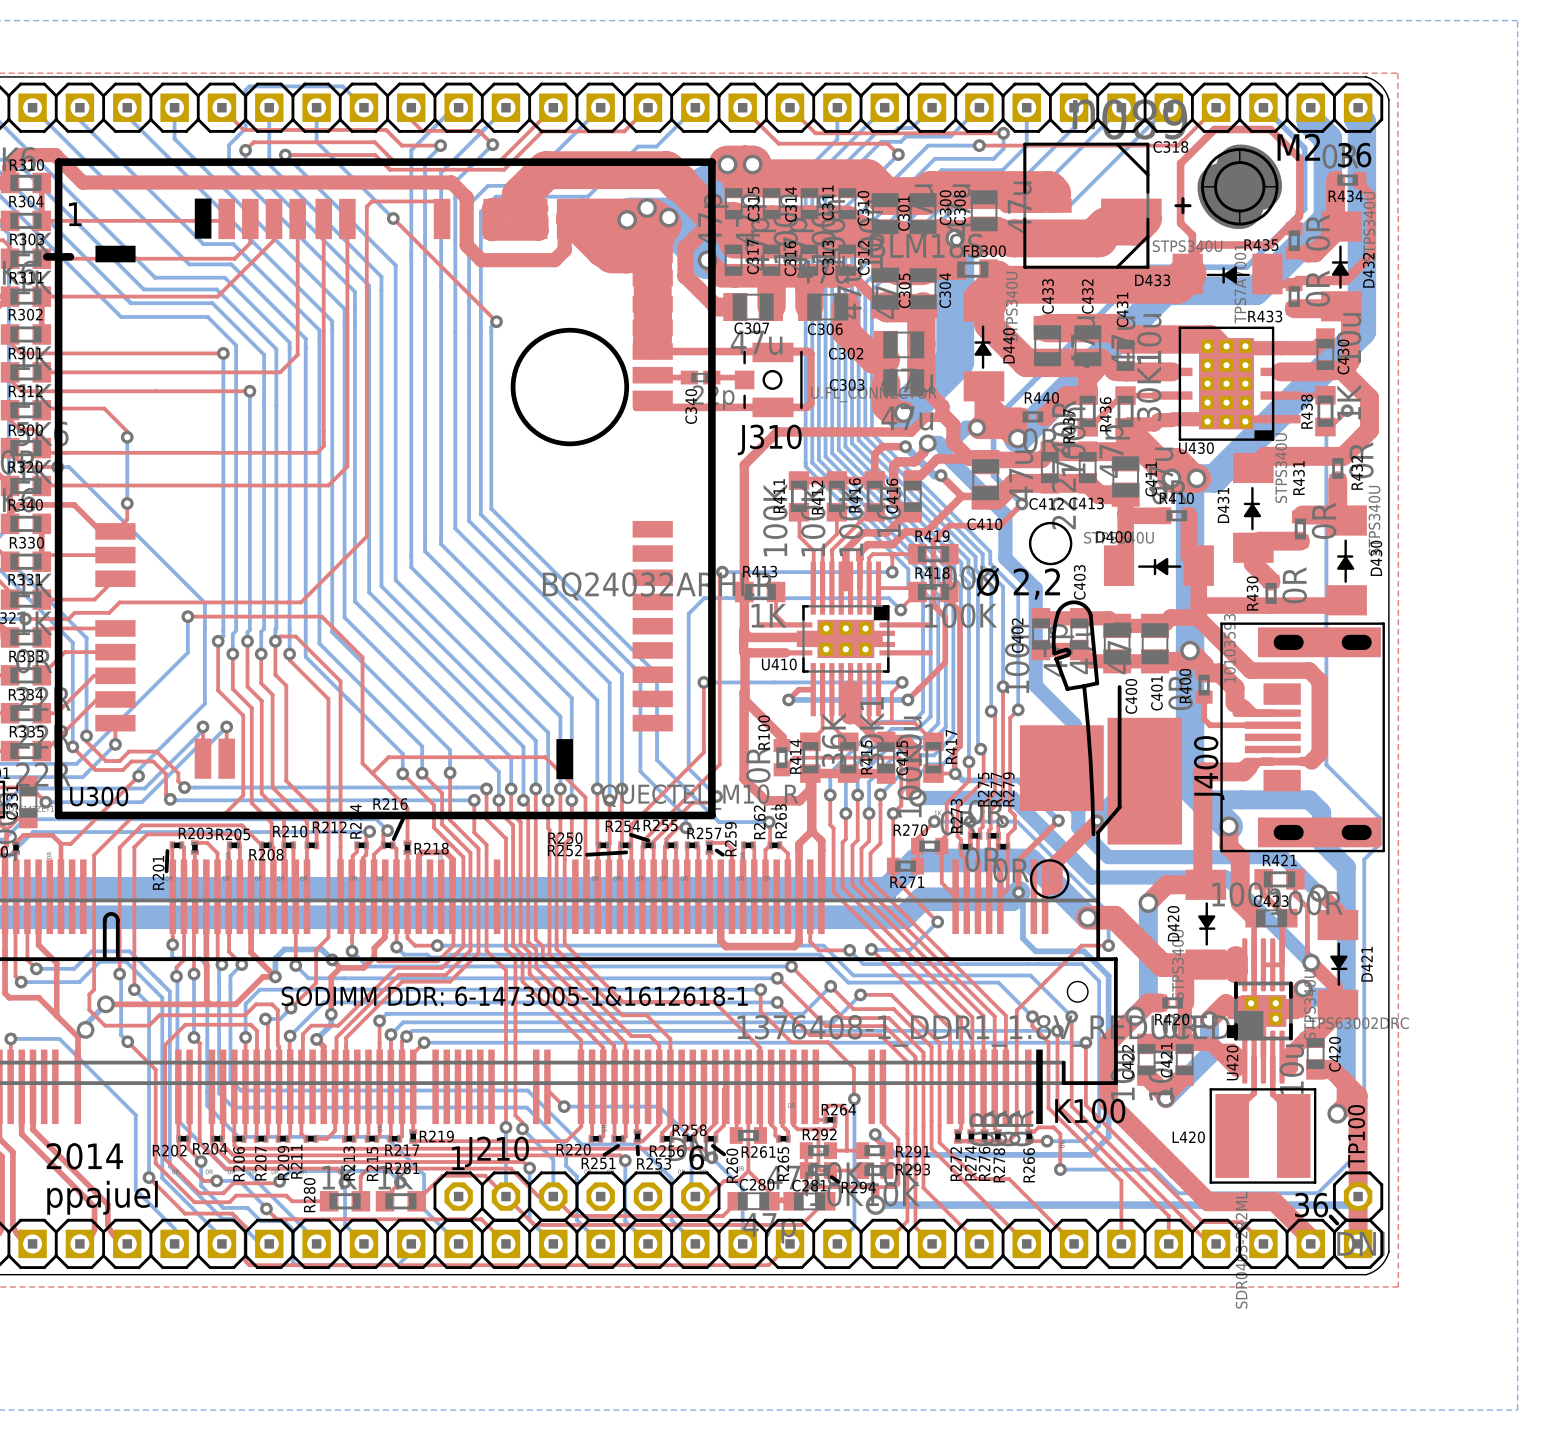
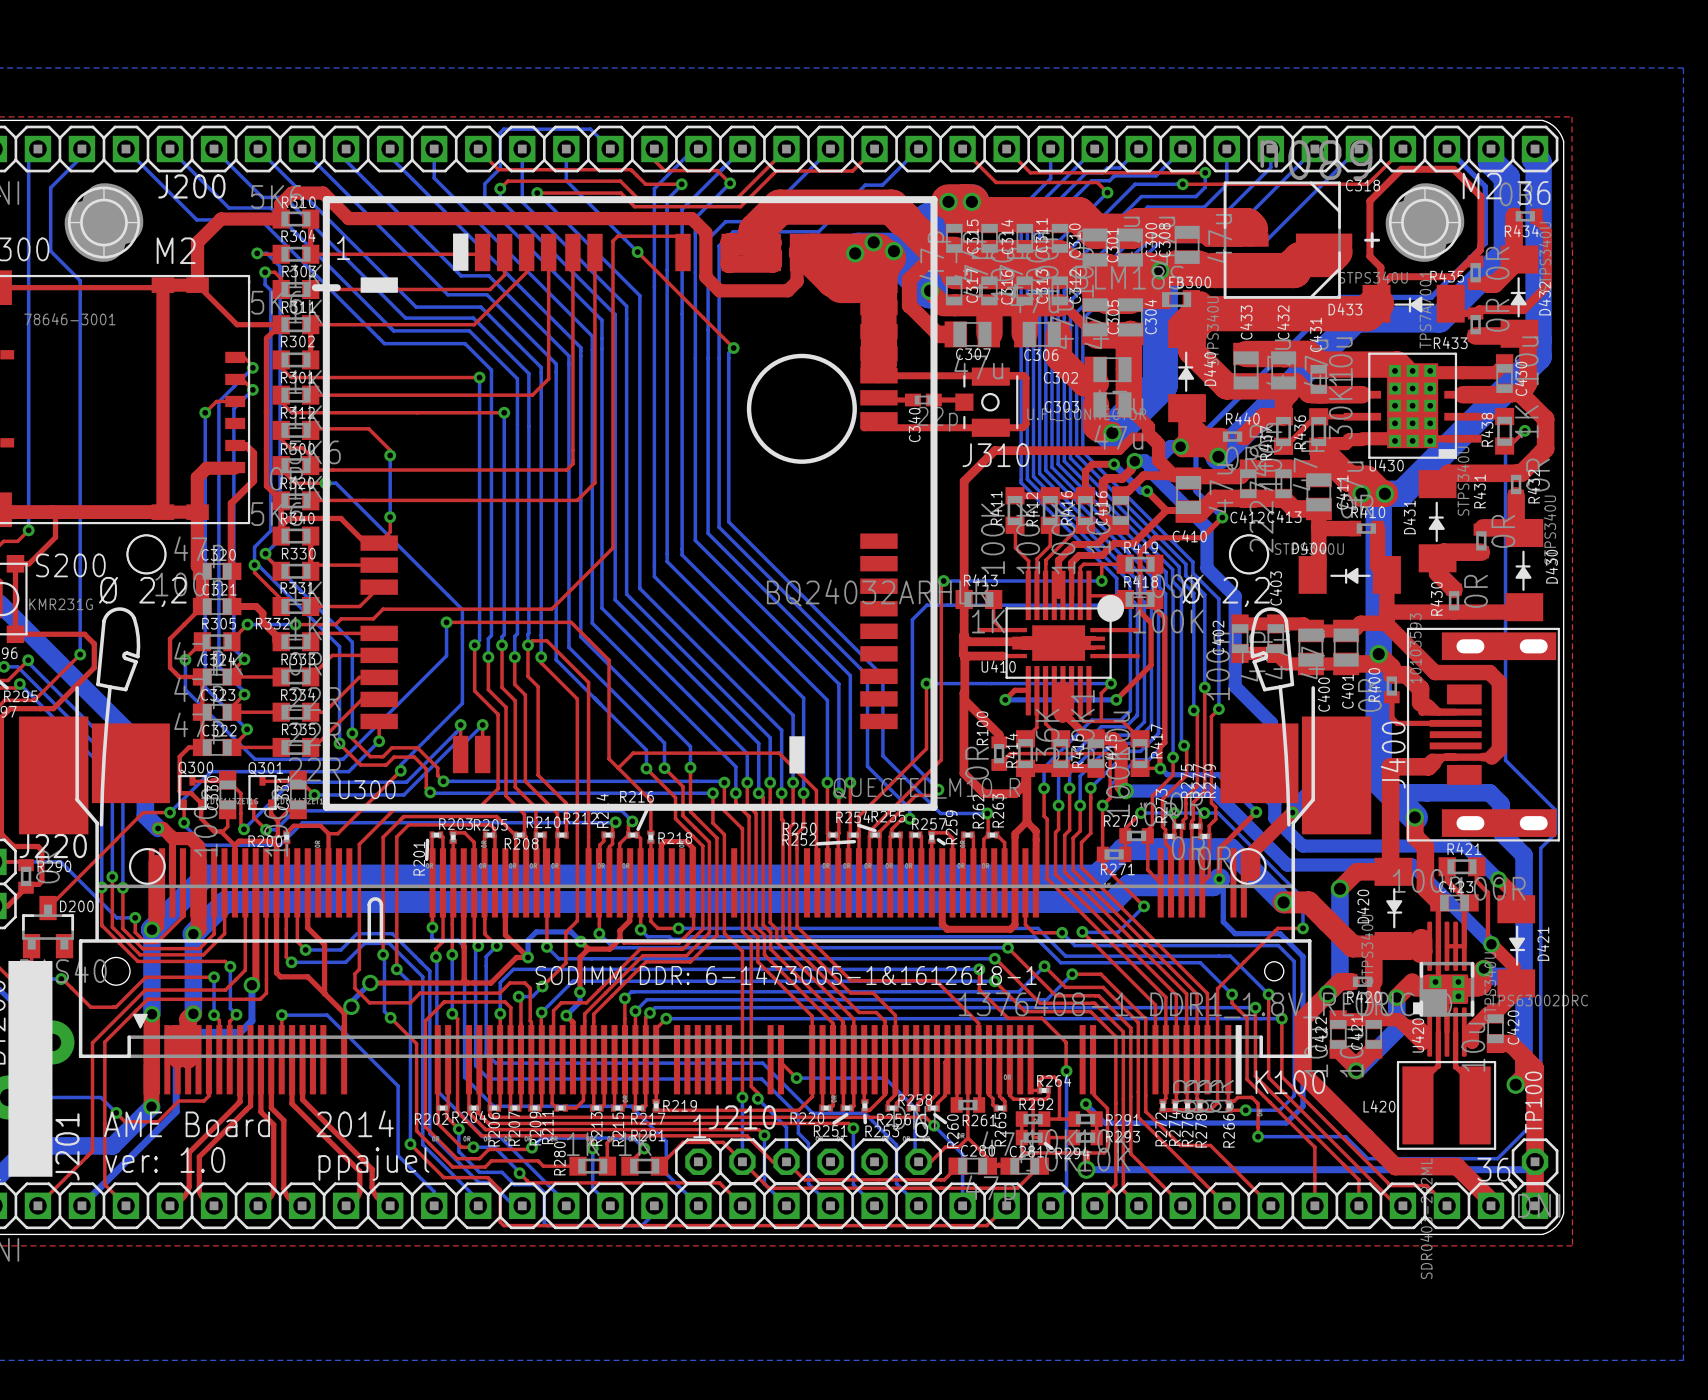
U410 footprint: [759, 561, 933, 717] -> [977, 570, 1140, 716]

